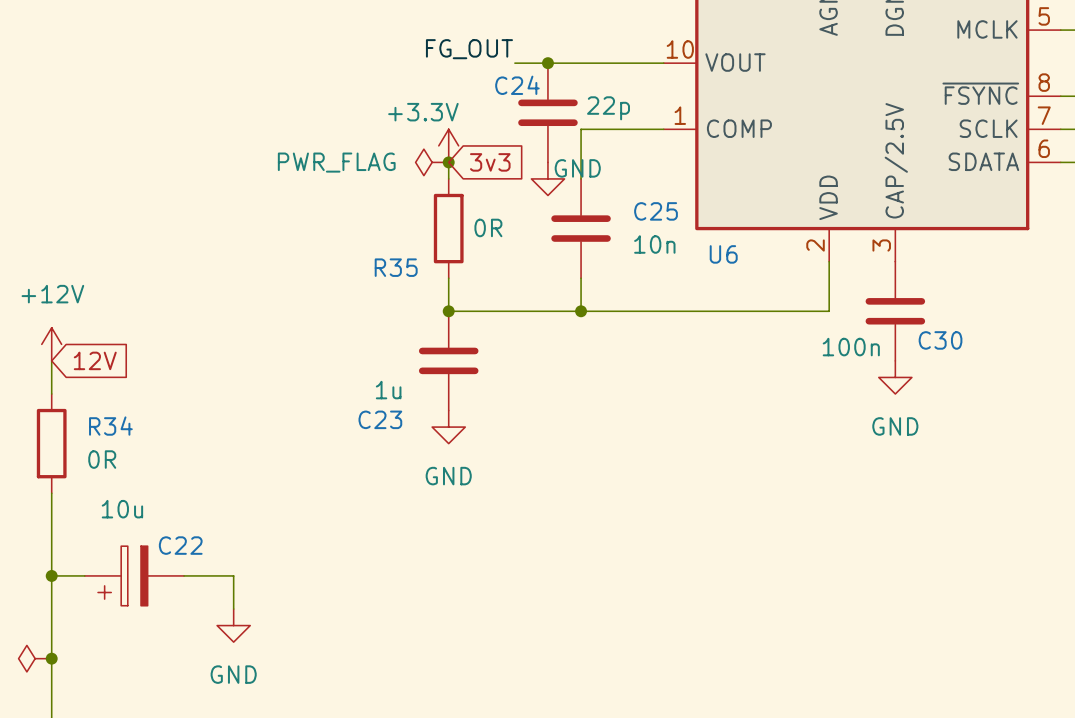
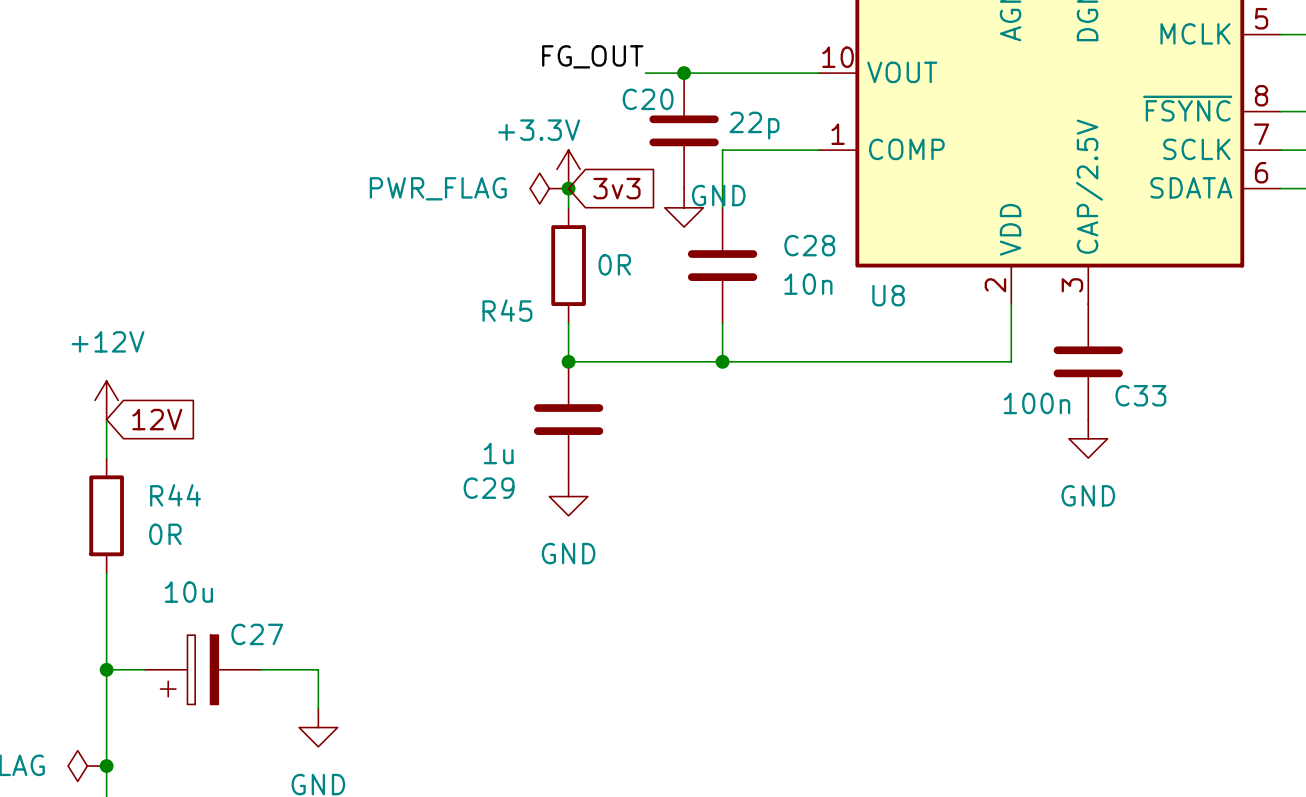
C24 name: C24 (517, 85) -> C20 (648, 99)
C25 name: C25 (656, 211) -> C28 (809, 245)
U6 name: U6 (723, 254) -> U8 (888, 295)
R35 name: R35 (396, 267) -> R45 (507, 310)
C30 name: C30 (940, 340) -> C33 (1140, 395)
C23 name: C23 (380, 419) -> C29 (489, 488)
R34 name: R34 (110, 426) -> R44 (175, 495)
C22 name: C22 (180, 545) -> C27 (257, 634)

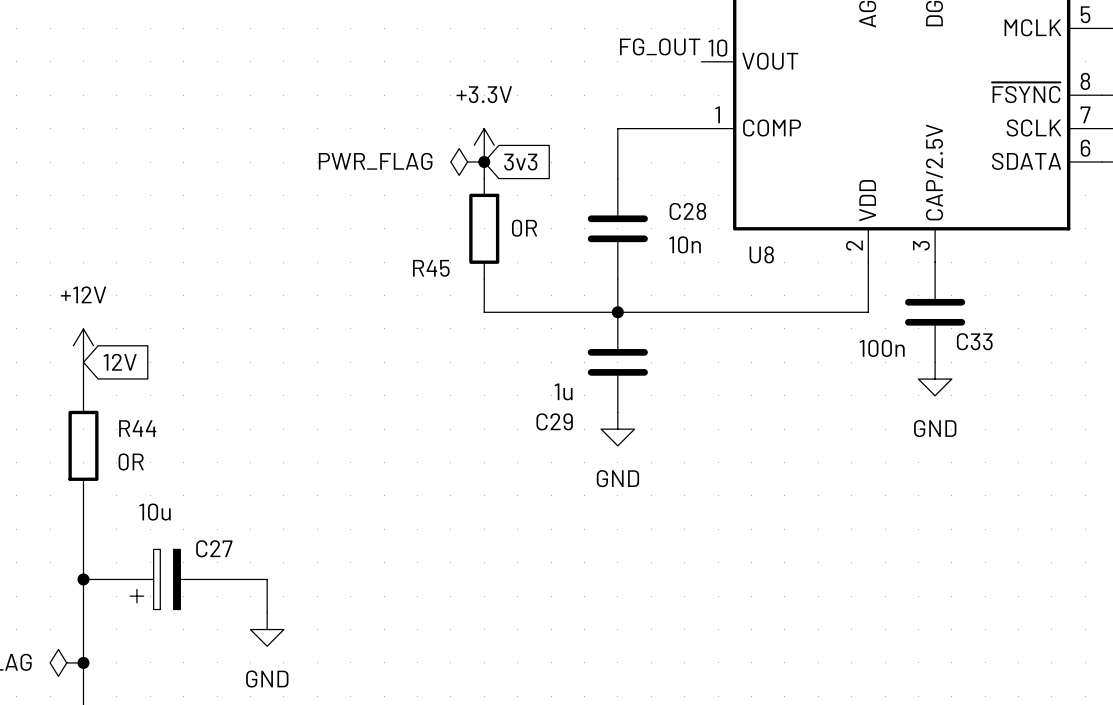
label position: FG_OUT (592, 56) -> FG_OUT (660, 46)
wire: (645, 73) (818, 73) -> none
junction: (684, 73) -> none
power symbol text position: +3.3V (539, 130) -> +3.3V (484, 94)
C20: 22p (684, 130) -> none
power symbol: GND (684, 207) -> none
junction: (568, 361) -> none
C29 position: (568, 419) -> (617, 362)
power symbol: GND (568, 496) -> none
power symbol: none -> GND (617, 429)

